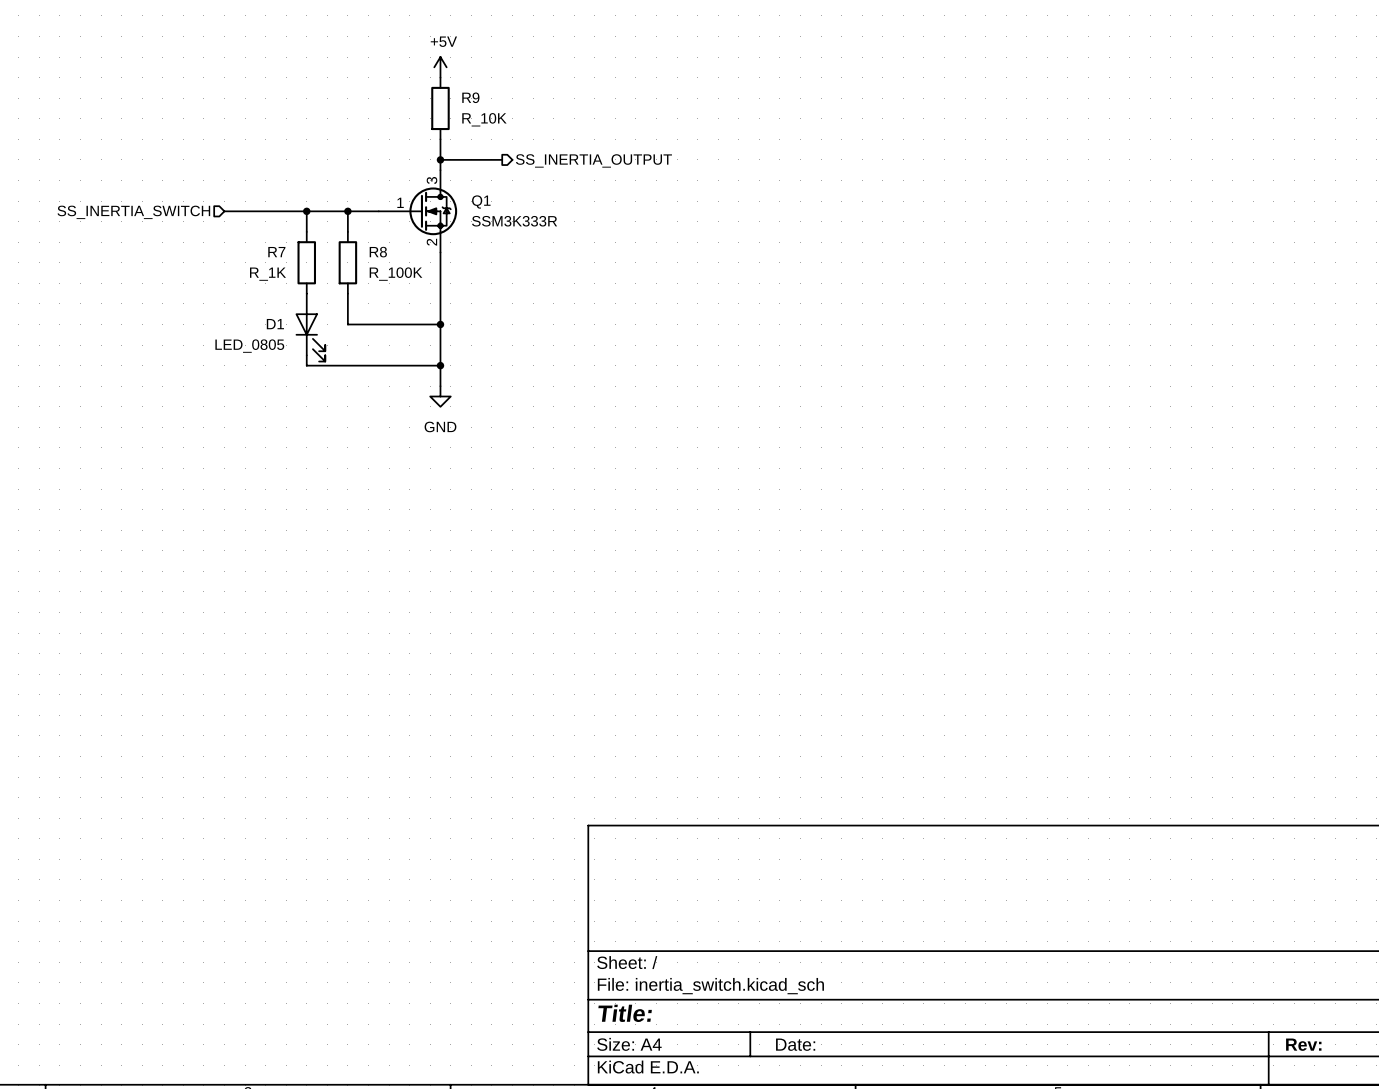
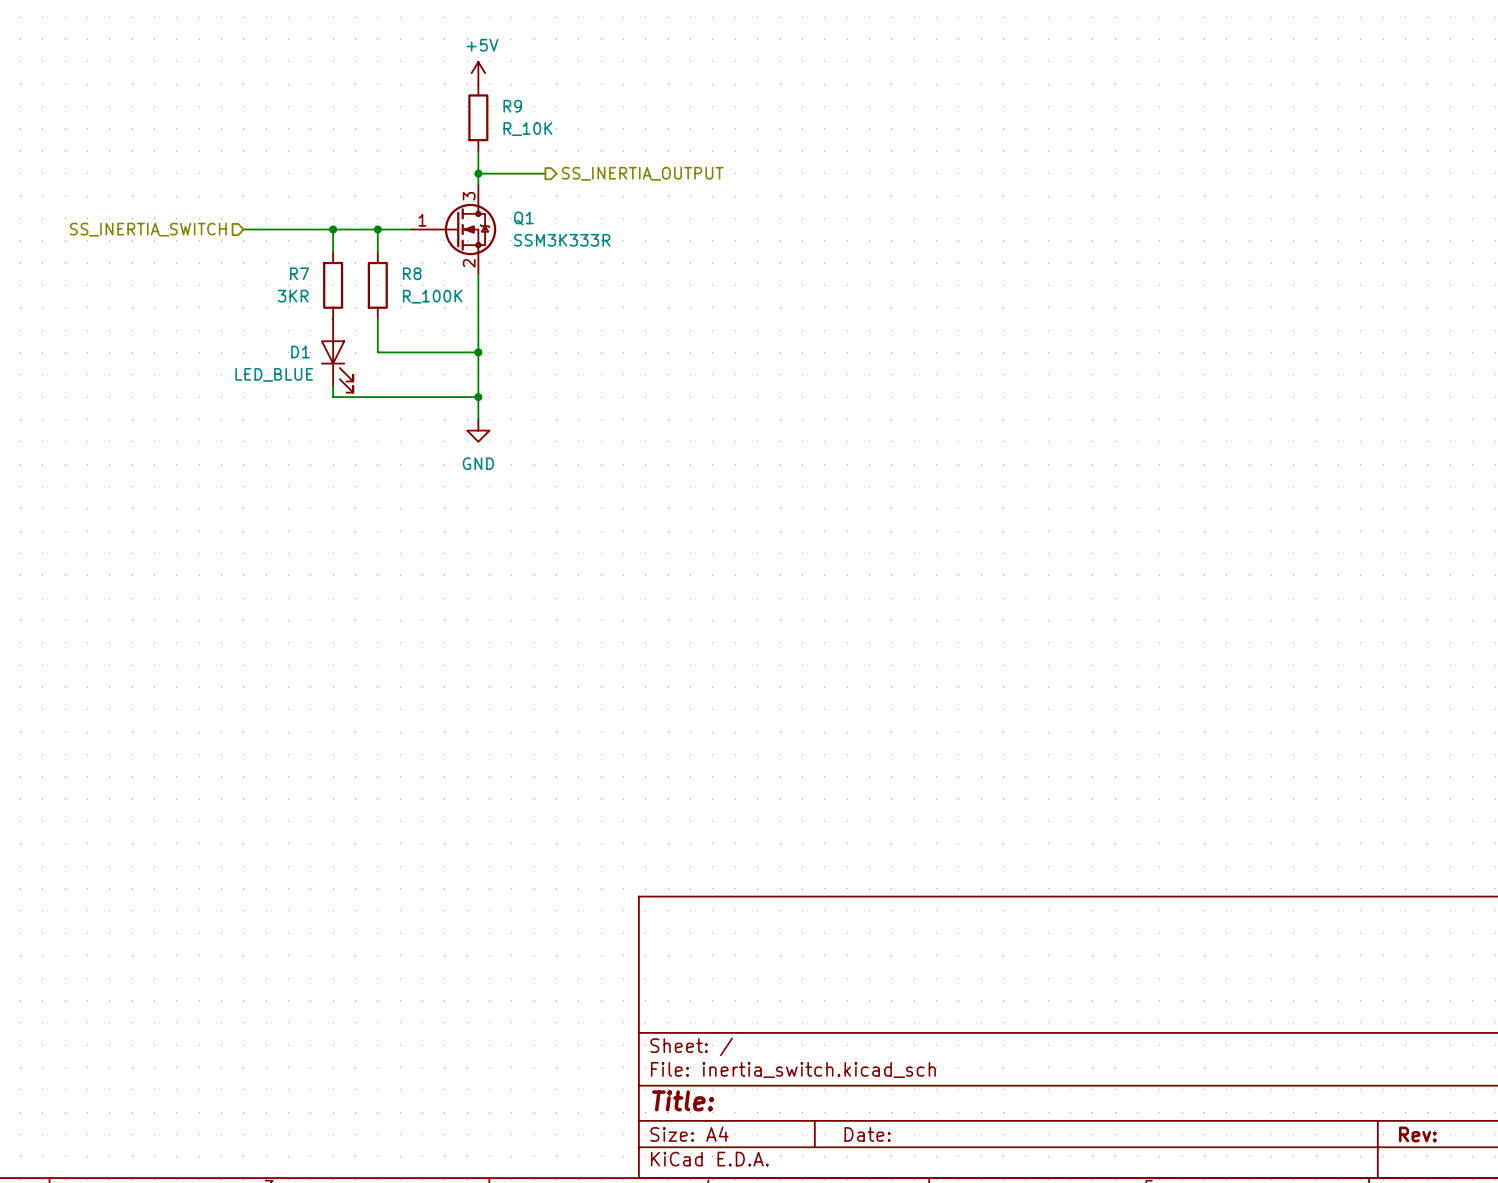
Q1 symbol: [378, 170, 458, 253] -> [411, 184, 497, 275]
R7 value: R_1K (268, 274) -> 3KR (293, 296)
D1 value: LED_0805 (249, 346) -> LED_BLUE (274, 374)

